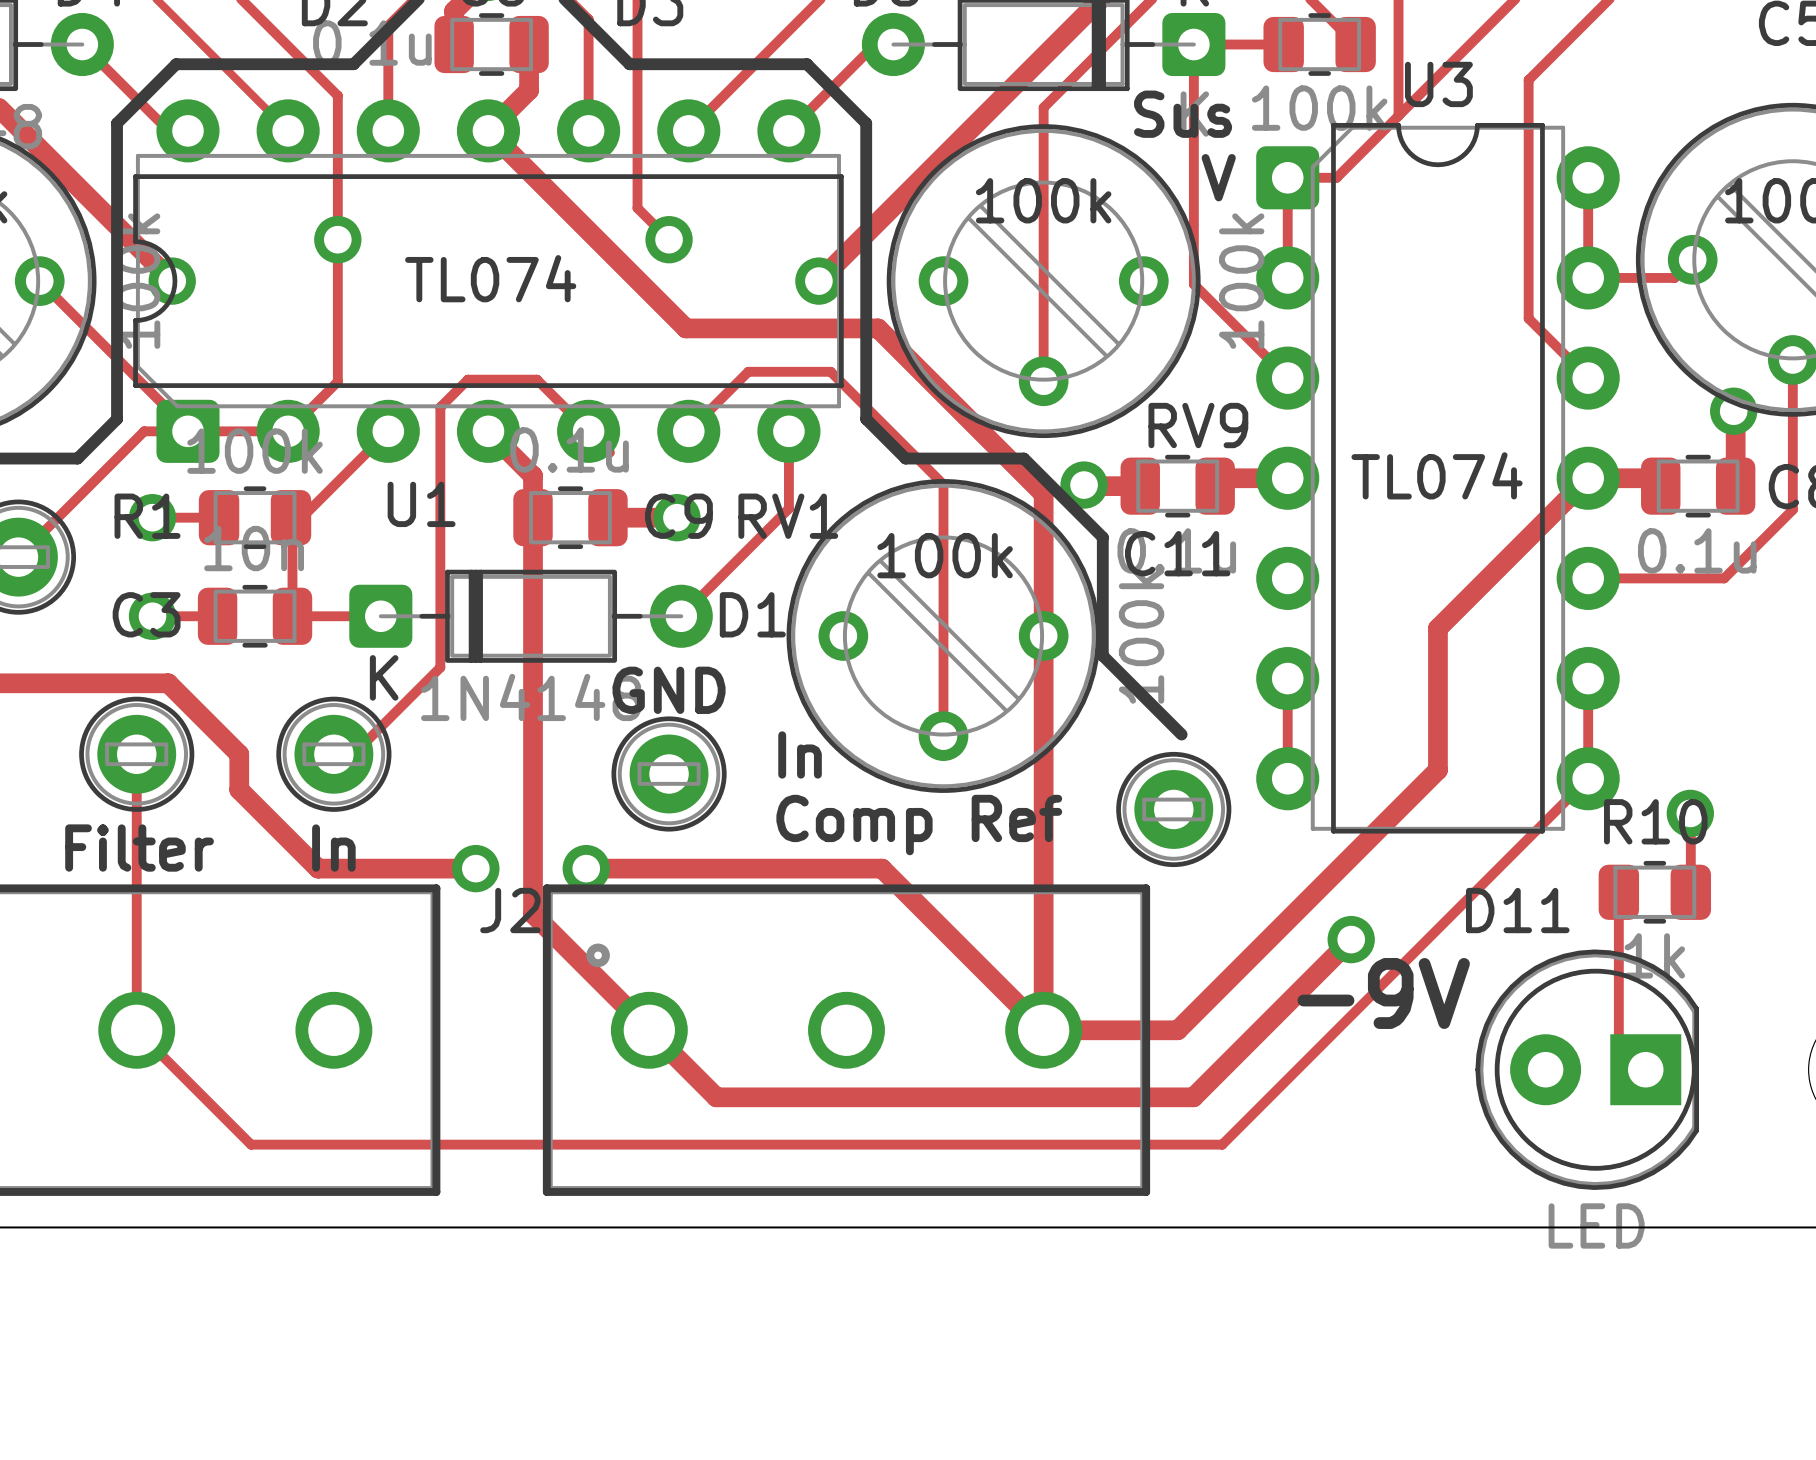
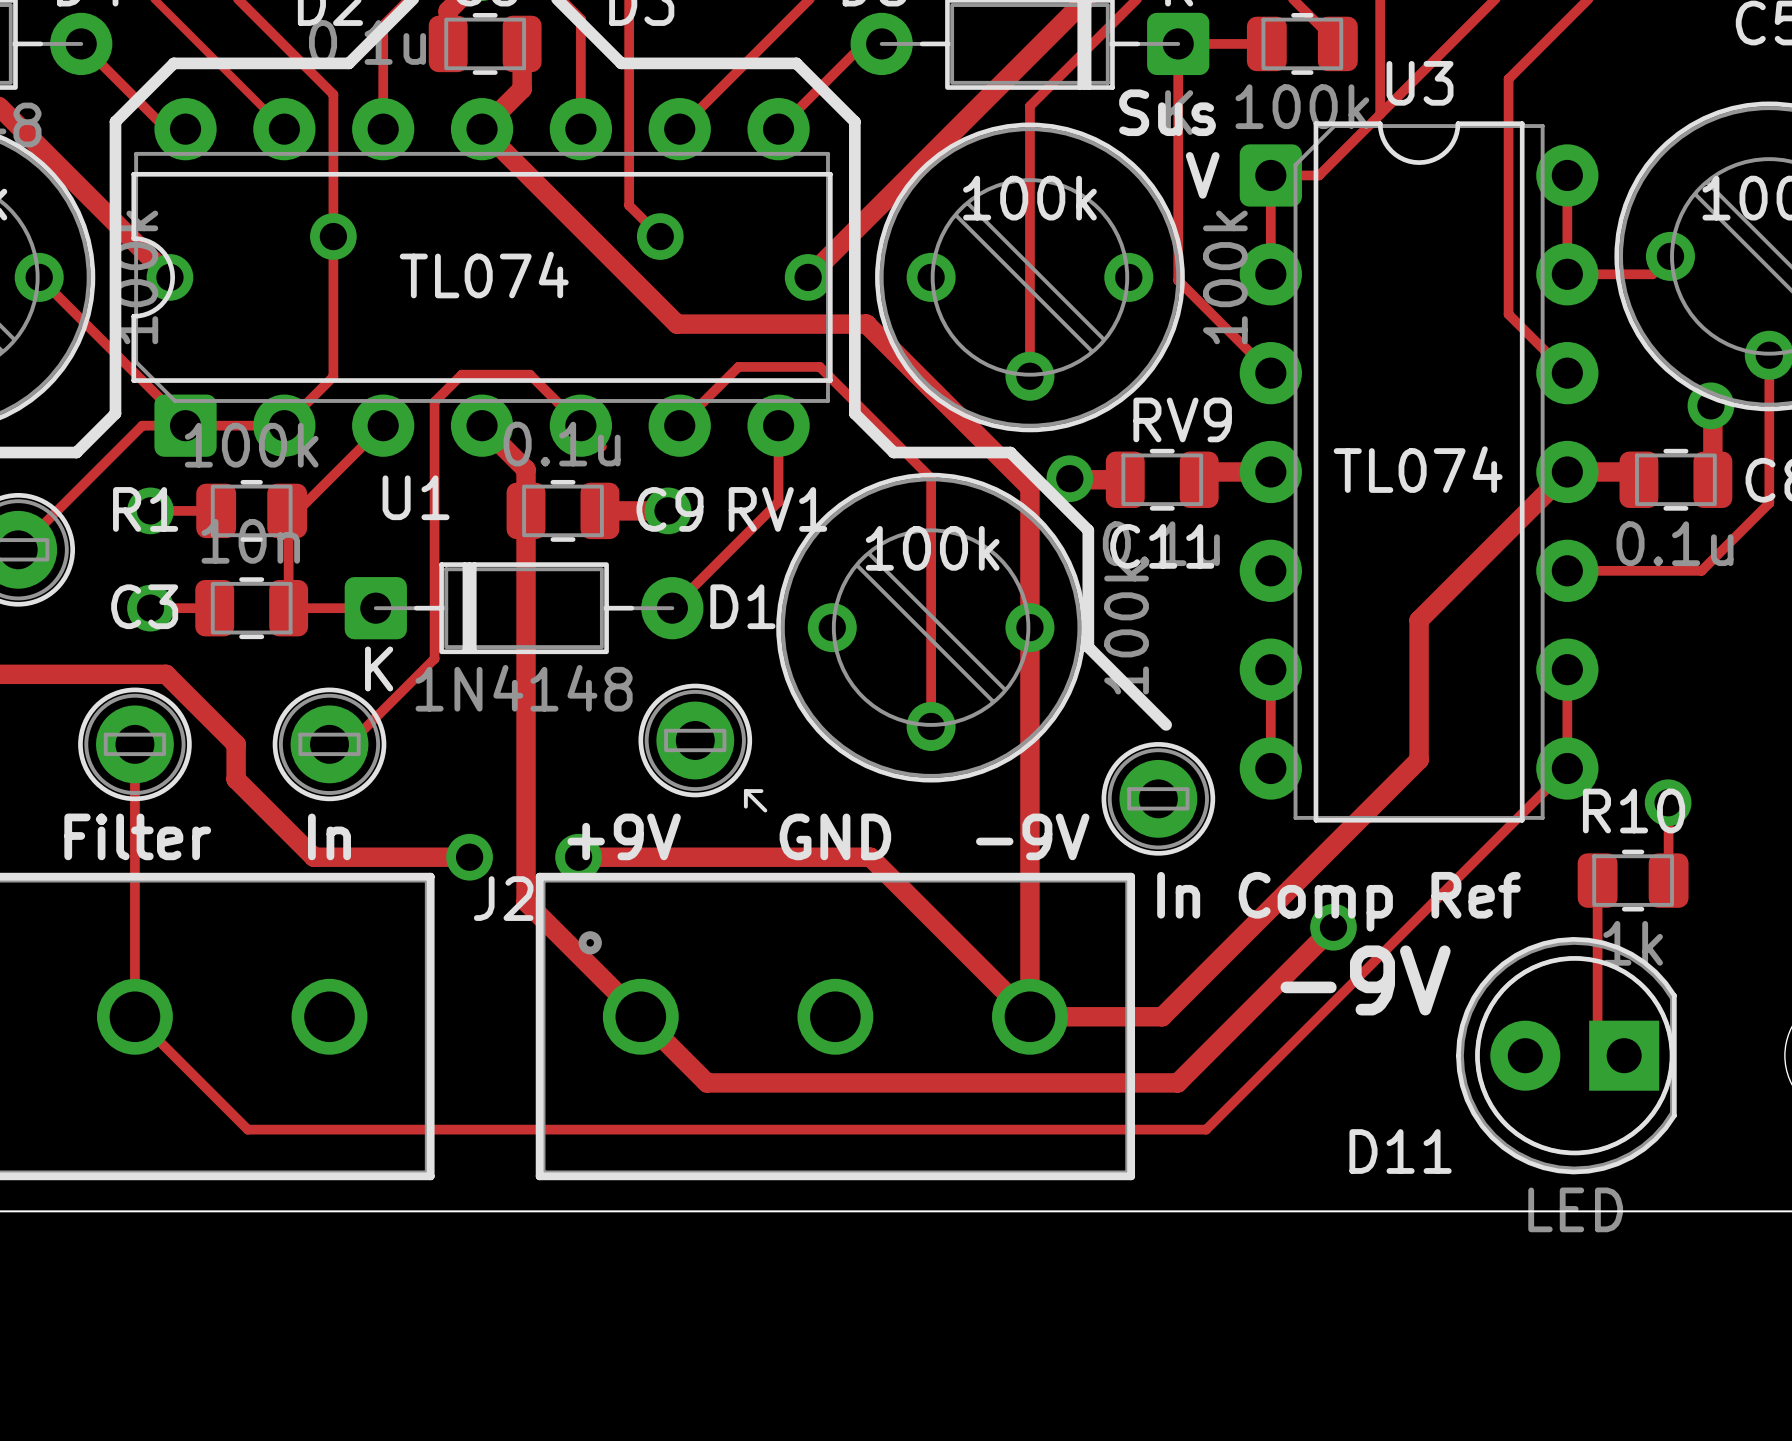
text position: GND (669, 690) -> GND (835, 836)
text: In (800, 754) -> none
part position: (669, 773) -> (695, 740)
line: none -> (745, 791) (745, 806)
line: none -> (745, 791) (761, 791)
line: none -> (745, 791) (765, 810)
text: Comp Ref (919, 825) -> none
text: none -> +9V (624, 836)
text: none -> -9V (1032, 836)
D11 name position: D11 (1517, 910) -> D11 (1400, 1151)
text: none -> In Comp Ref (1338, 901)

